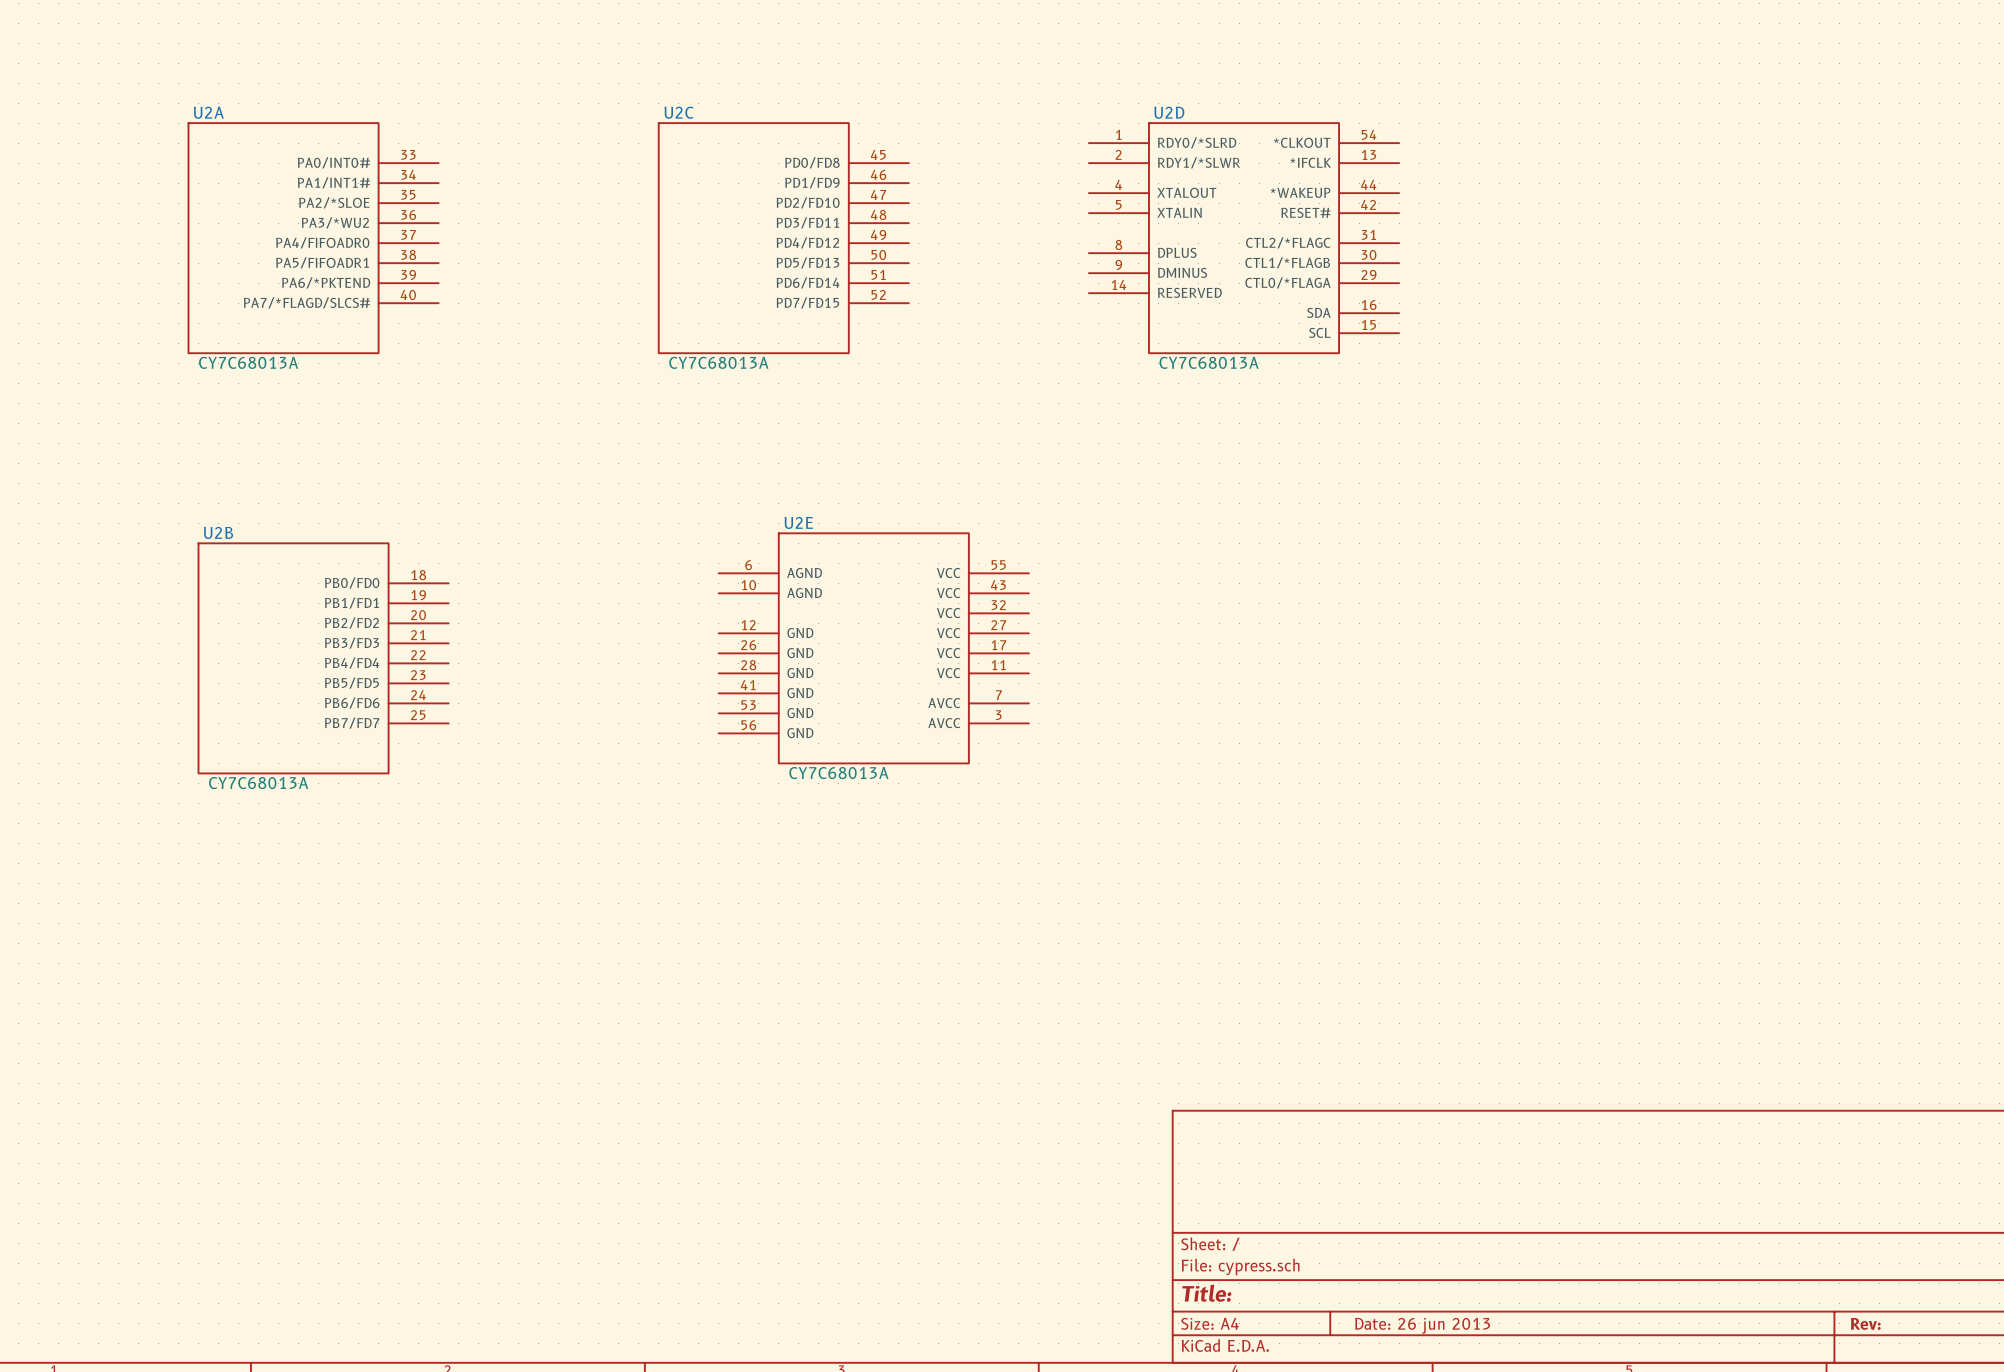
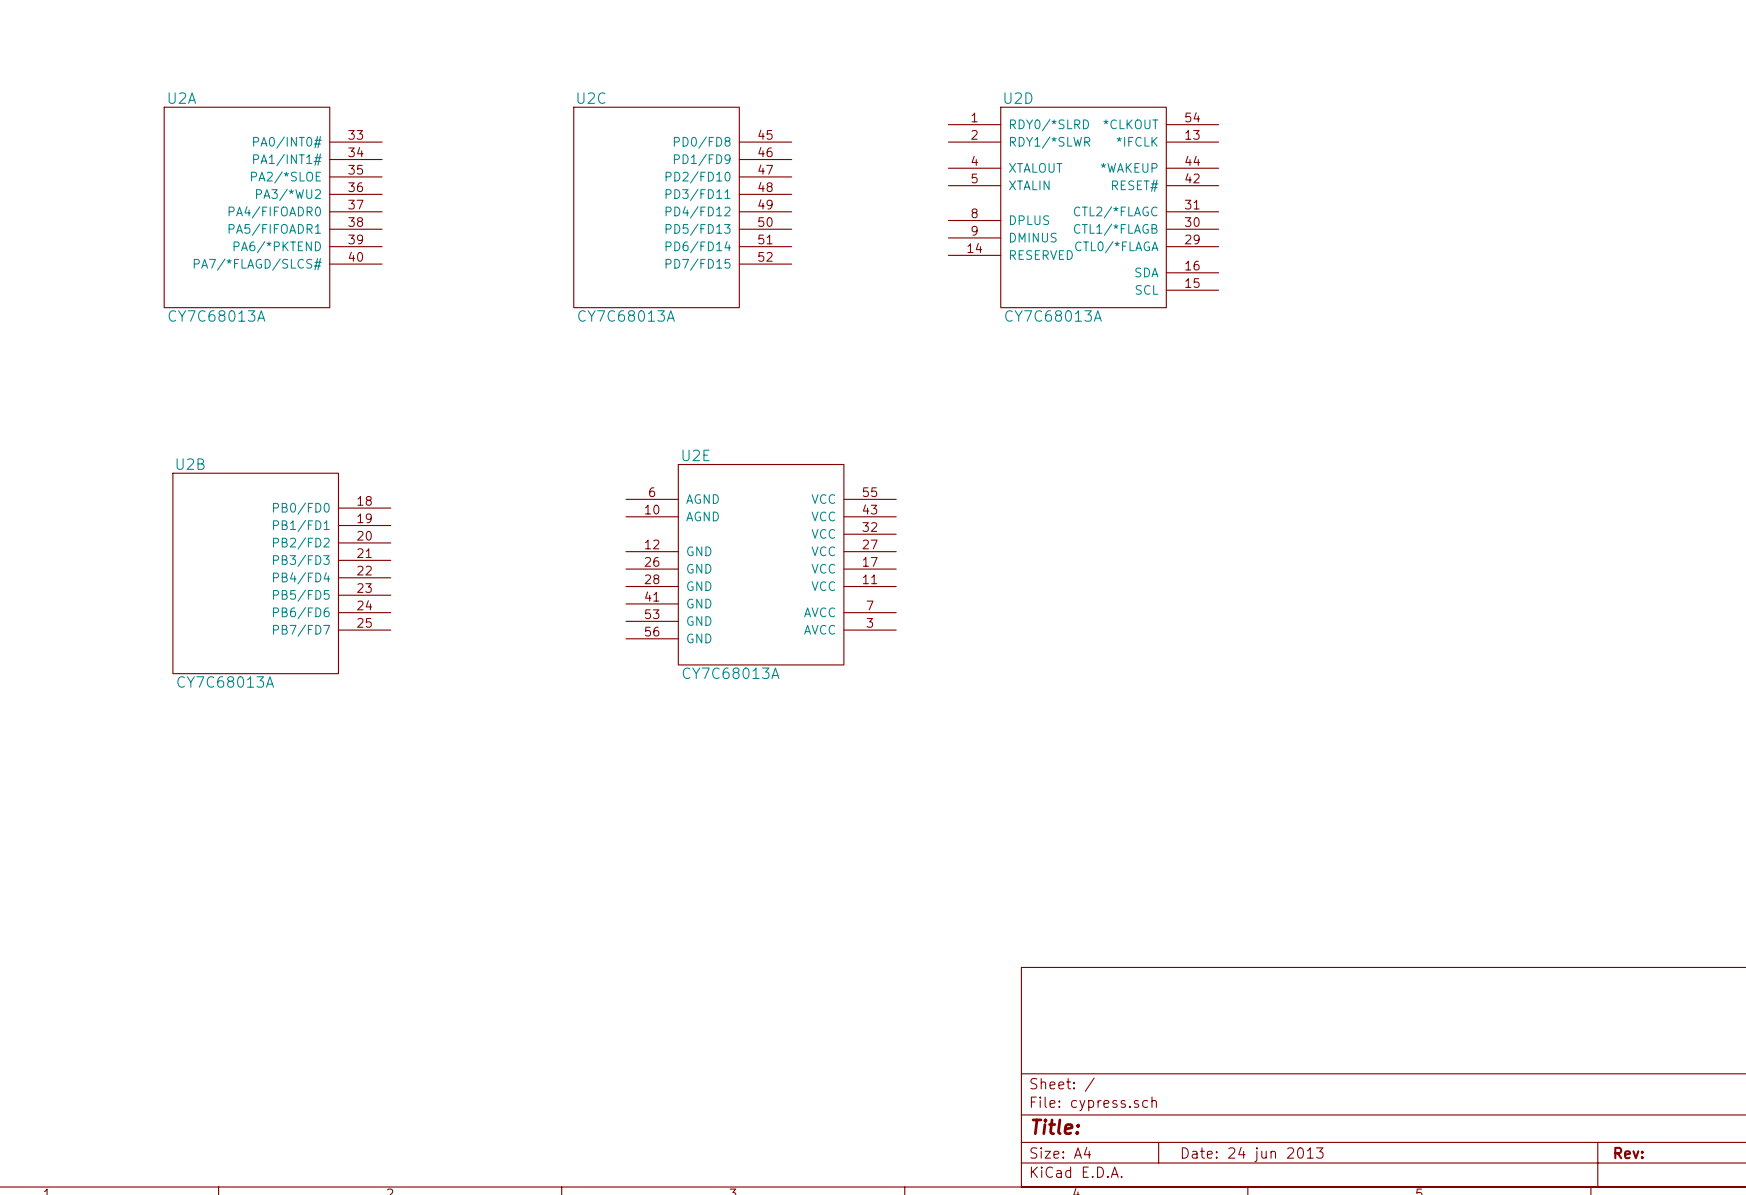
title block: Date: 26 jun 2013 (1422, 1325) -> Date: 24 jun 2013 (1252, 1154)

